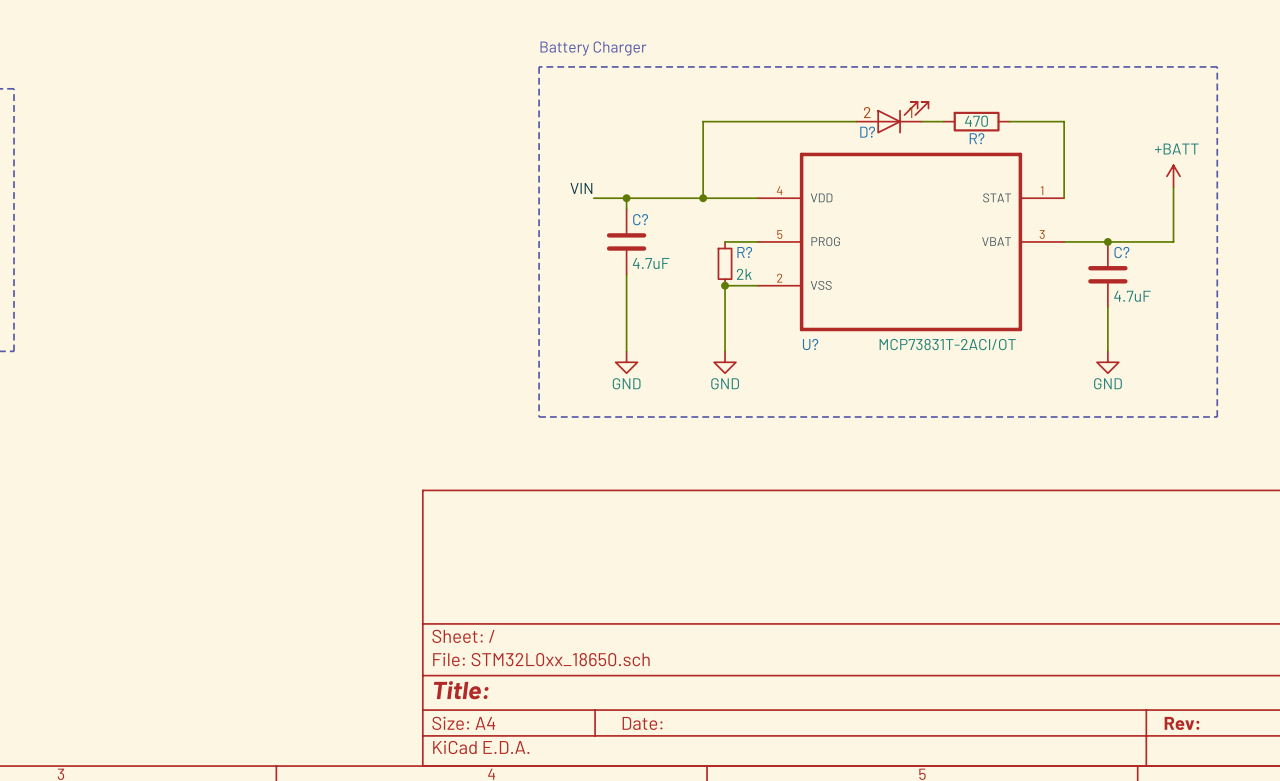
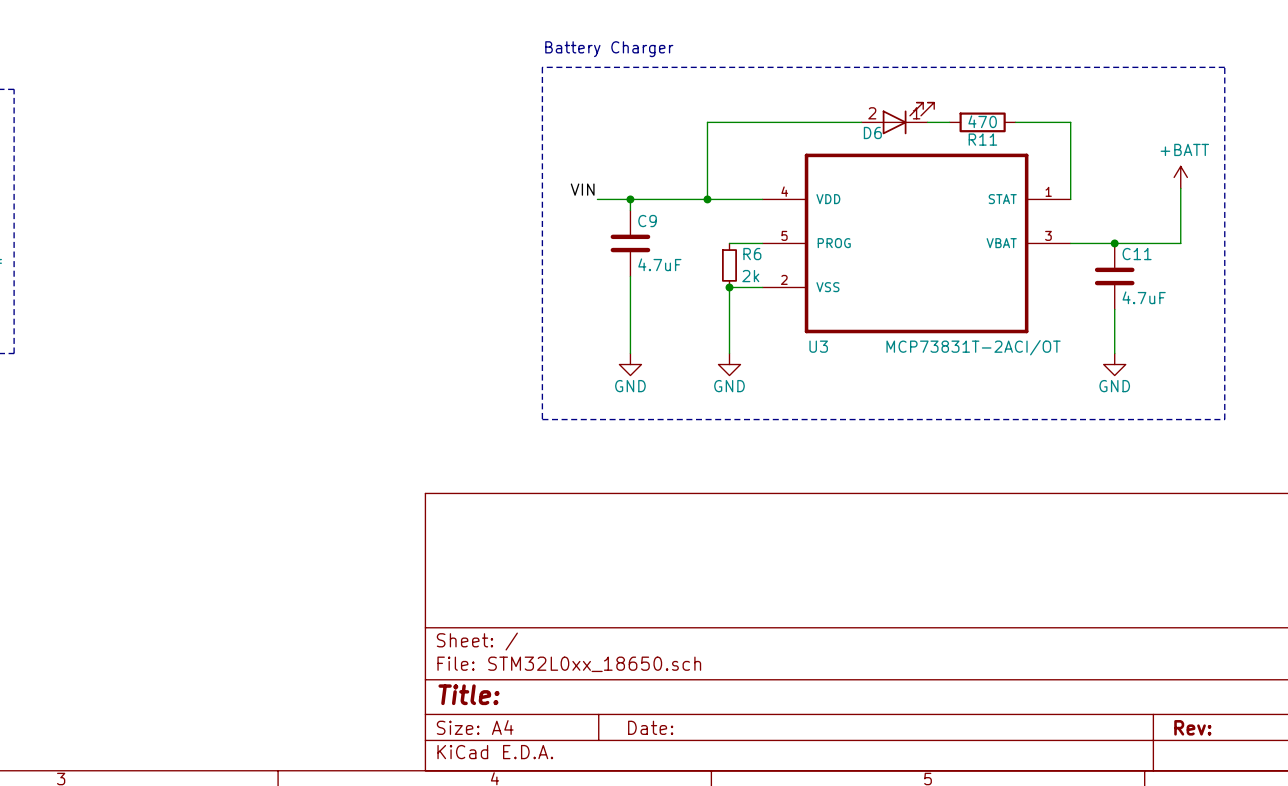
D? name: D? (867, 132) -> D6 (872, 132)
R? name: R? (977, 138) -> R11 (982, 139)
C? name: C? (640, 219) -> C9 (647, 221)
R? name: R? (744, 252) -> R6 (752, 254)
C? name: C? (1121, 252) -> C11 (1137, 254)
U? name: U? (810, 344) -> U3 (818, 346)

